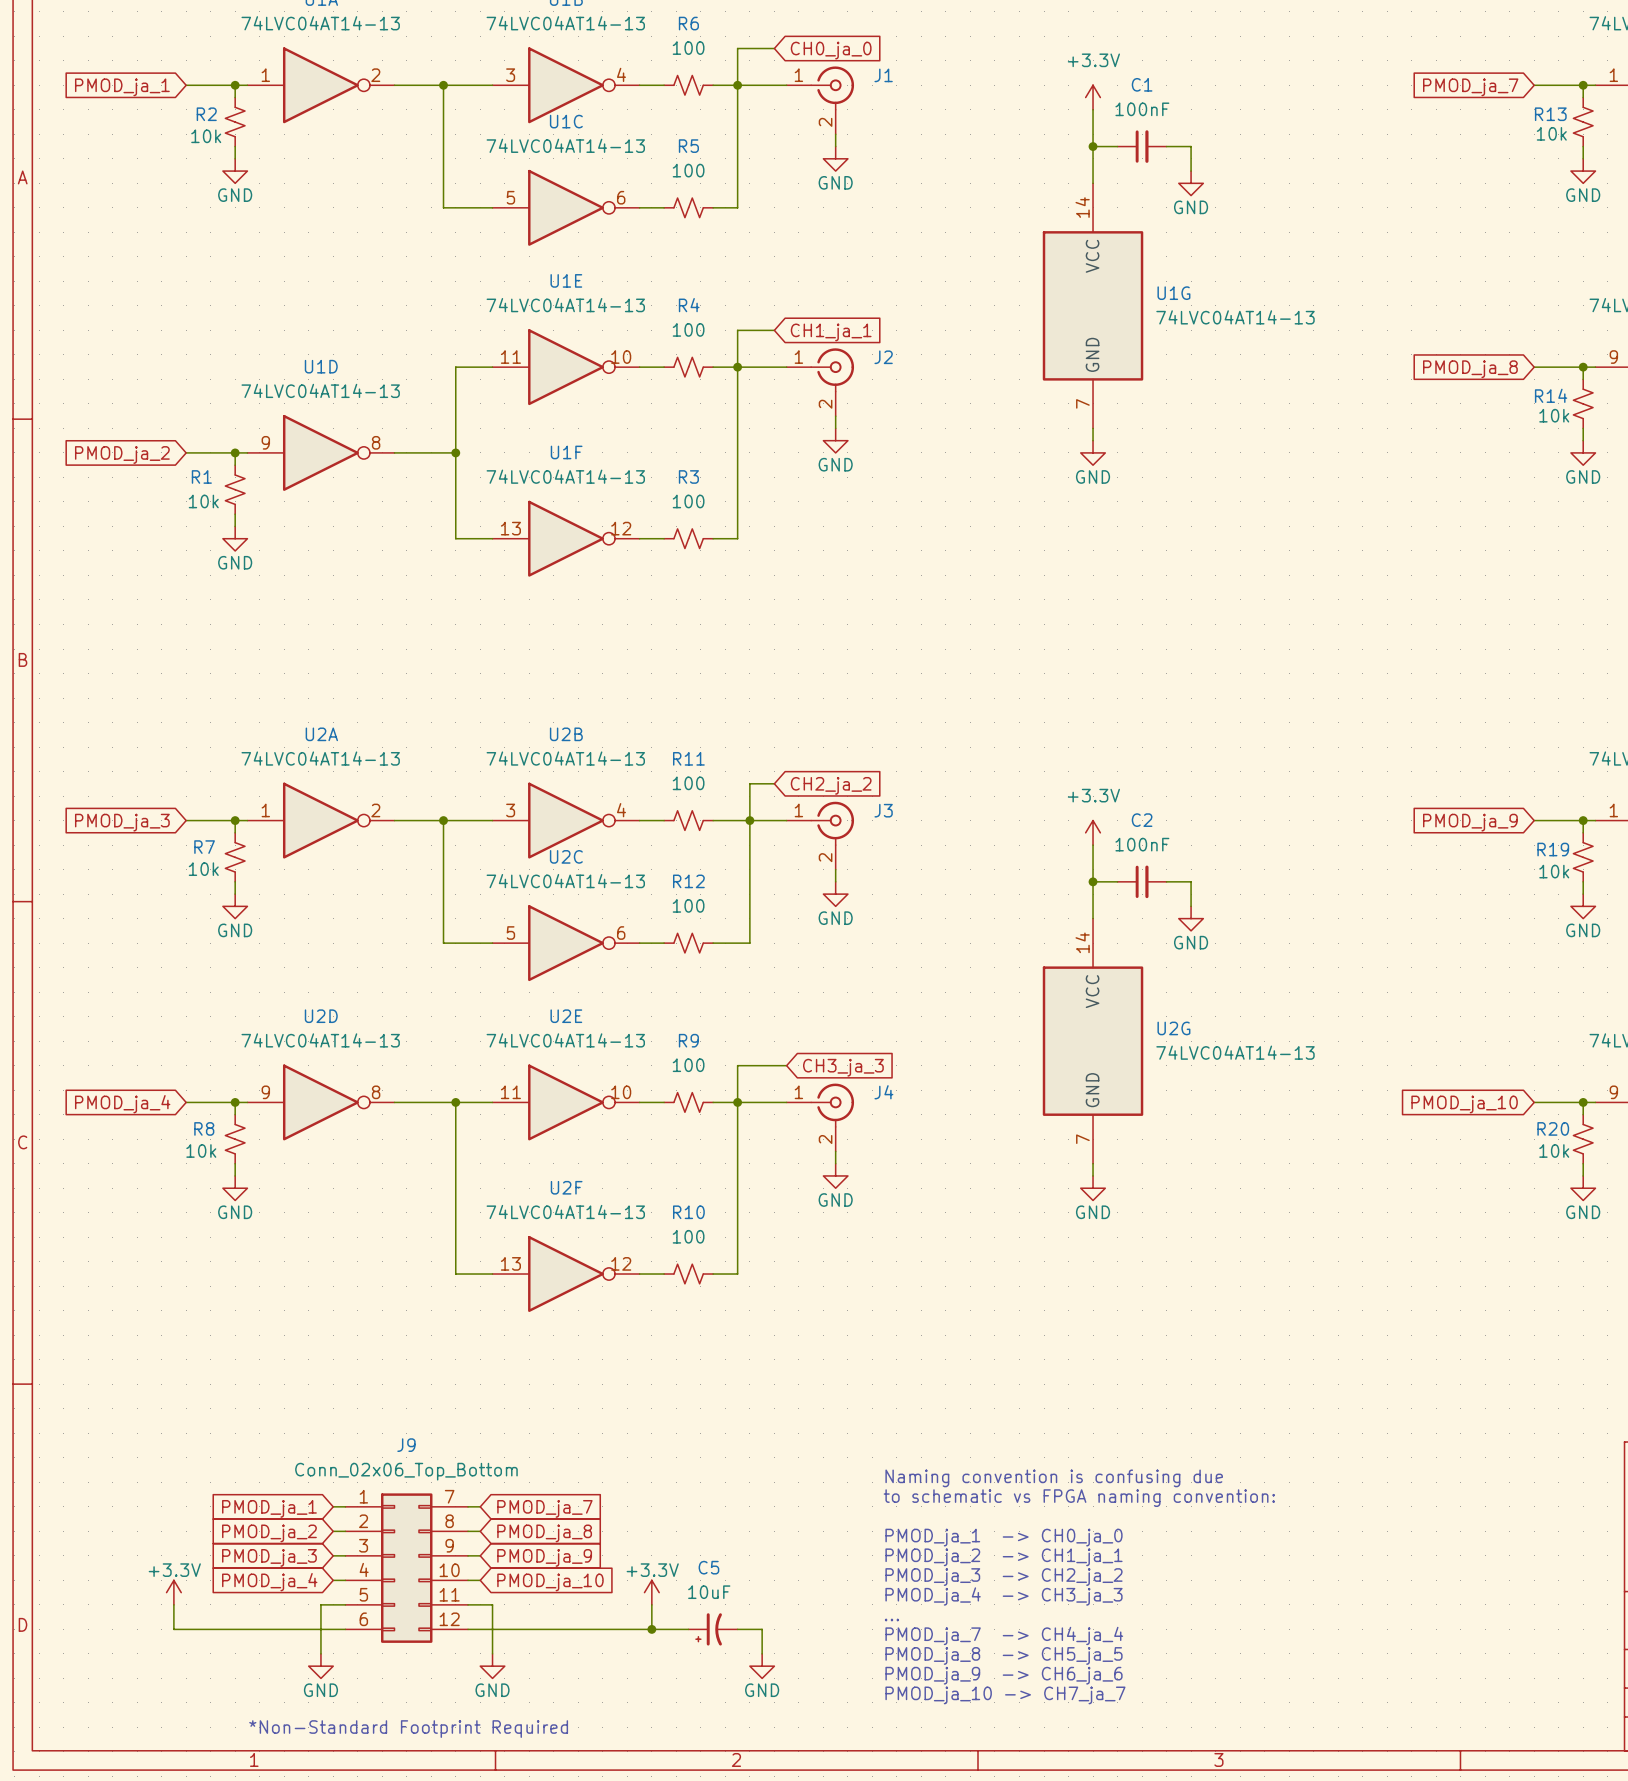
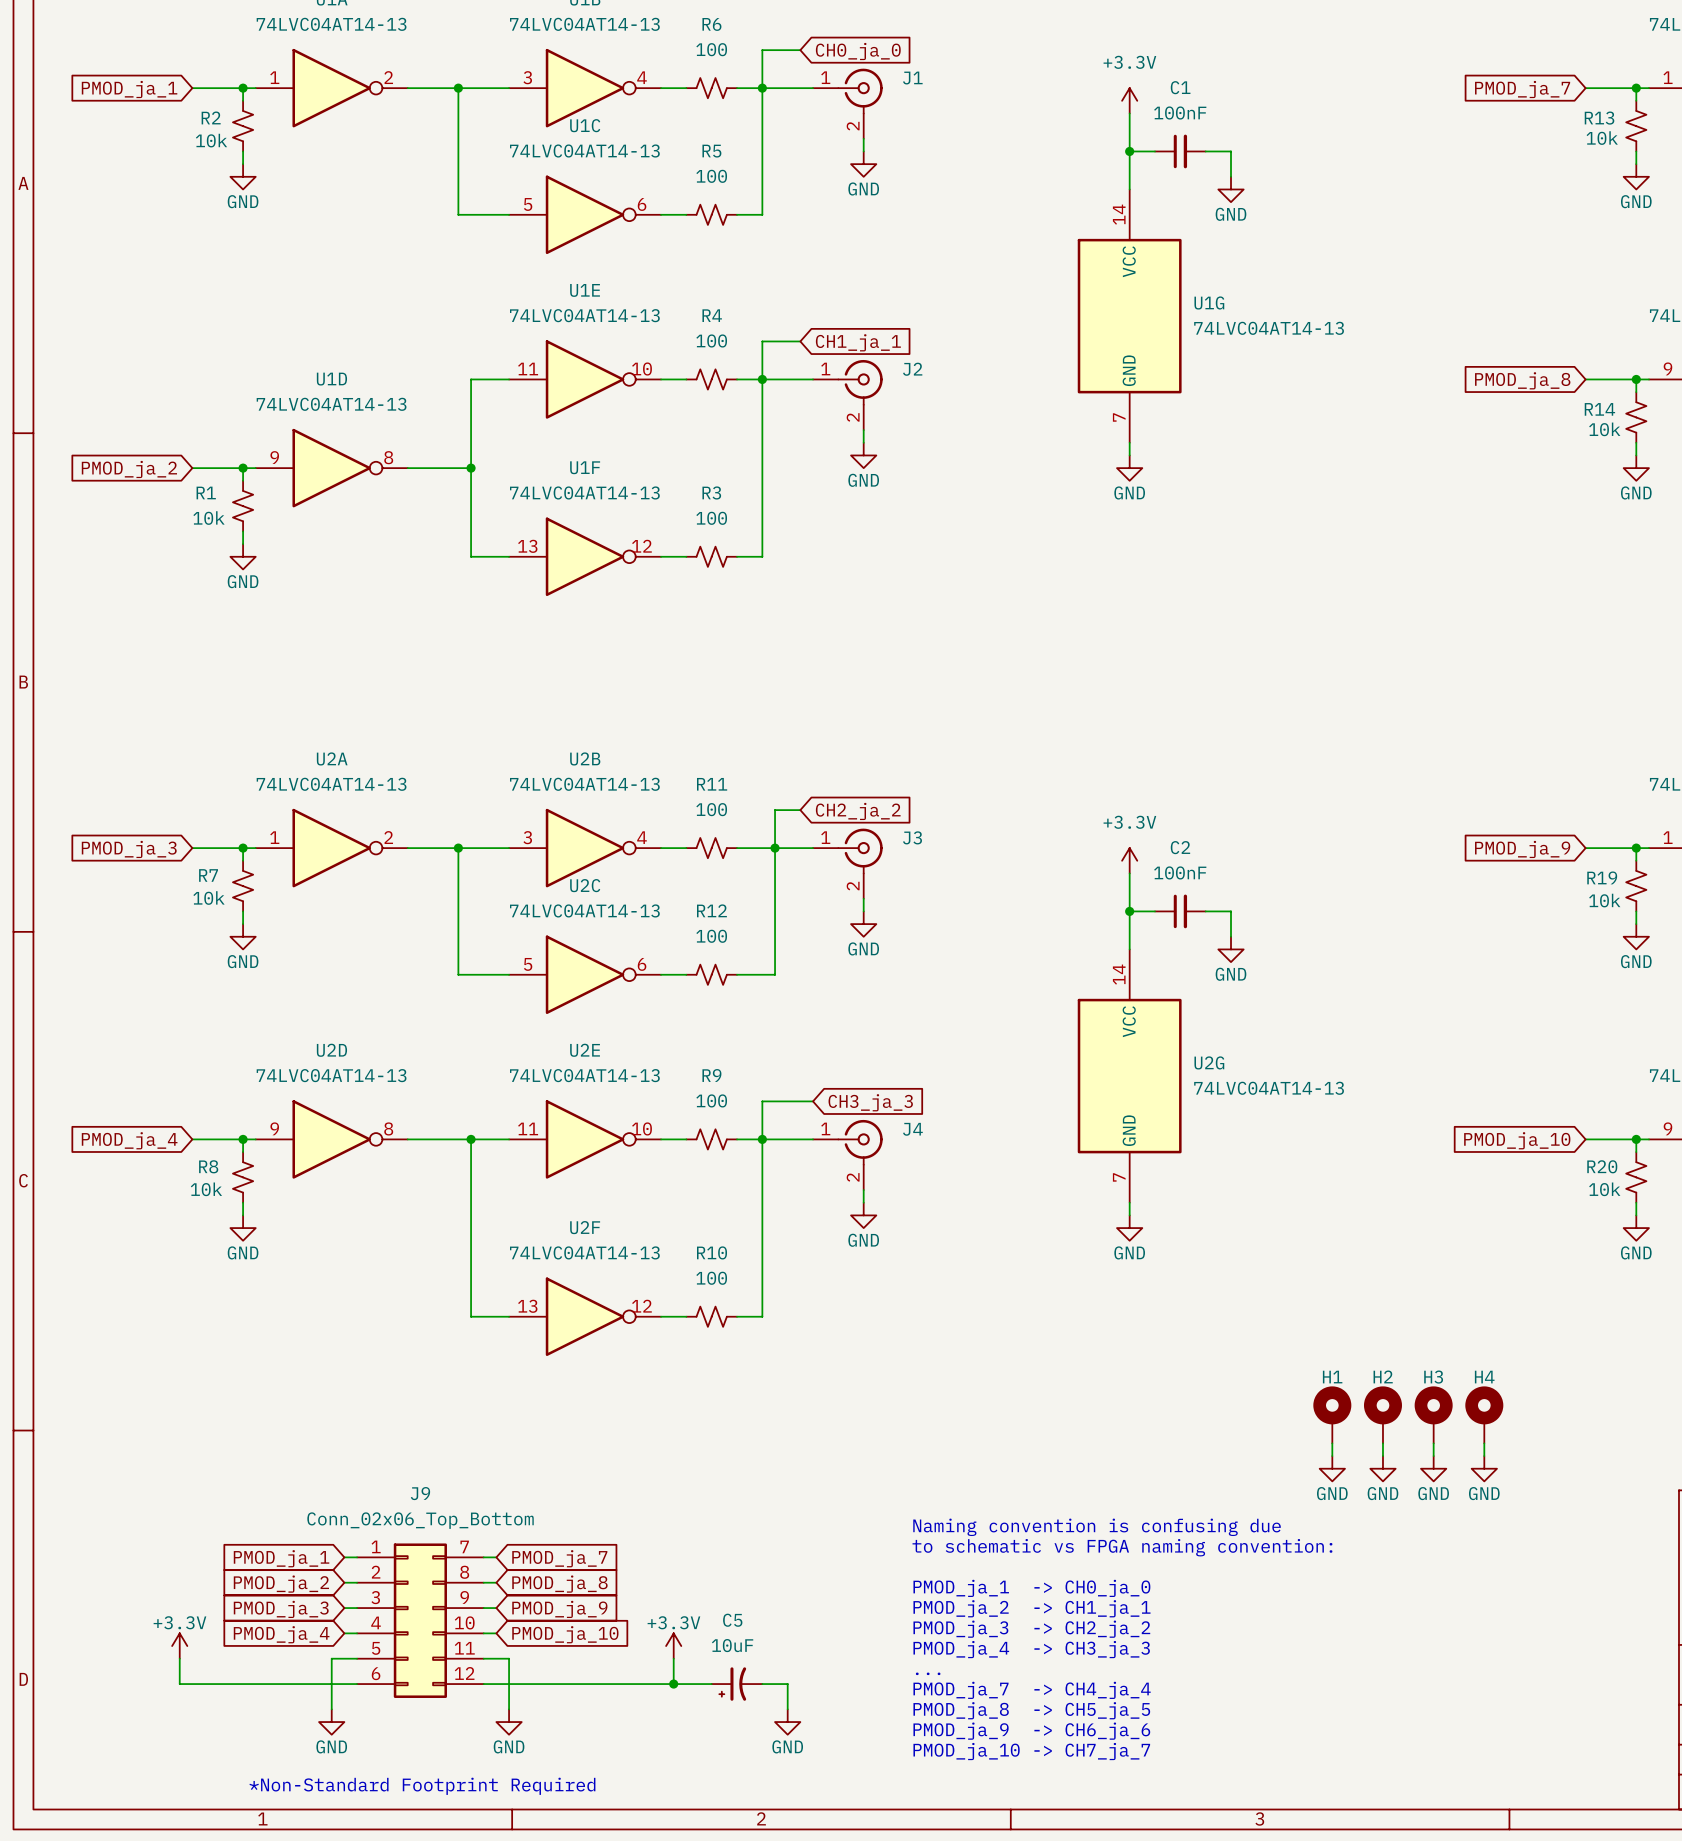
H1: none -> (1332, 1414)
H2: none -> (1382, 1414)
H3: none -> (1433, 1414)
H4: none -> (1484, 1414)
wire: none -> (1332, 1443) (1332, 1456)
wire: none -> (1382, 1443) (1382, 1456)
wire: none -> (1433, 1443) (1433, 1456)
wire: none -> (1484, 1443) (1484, 1456)
power symbol: none -> GND (1332, 1468)
power symbol: none -> GND (1382, 1468)
power symbol: none -> GND (1433, 1468)
power symbol: none -> GND (1484, 1468)

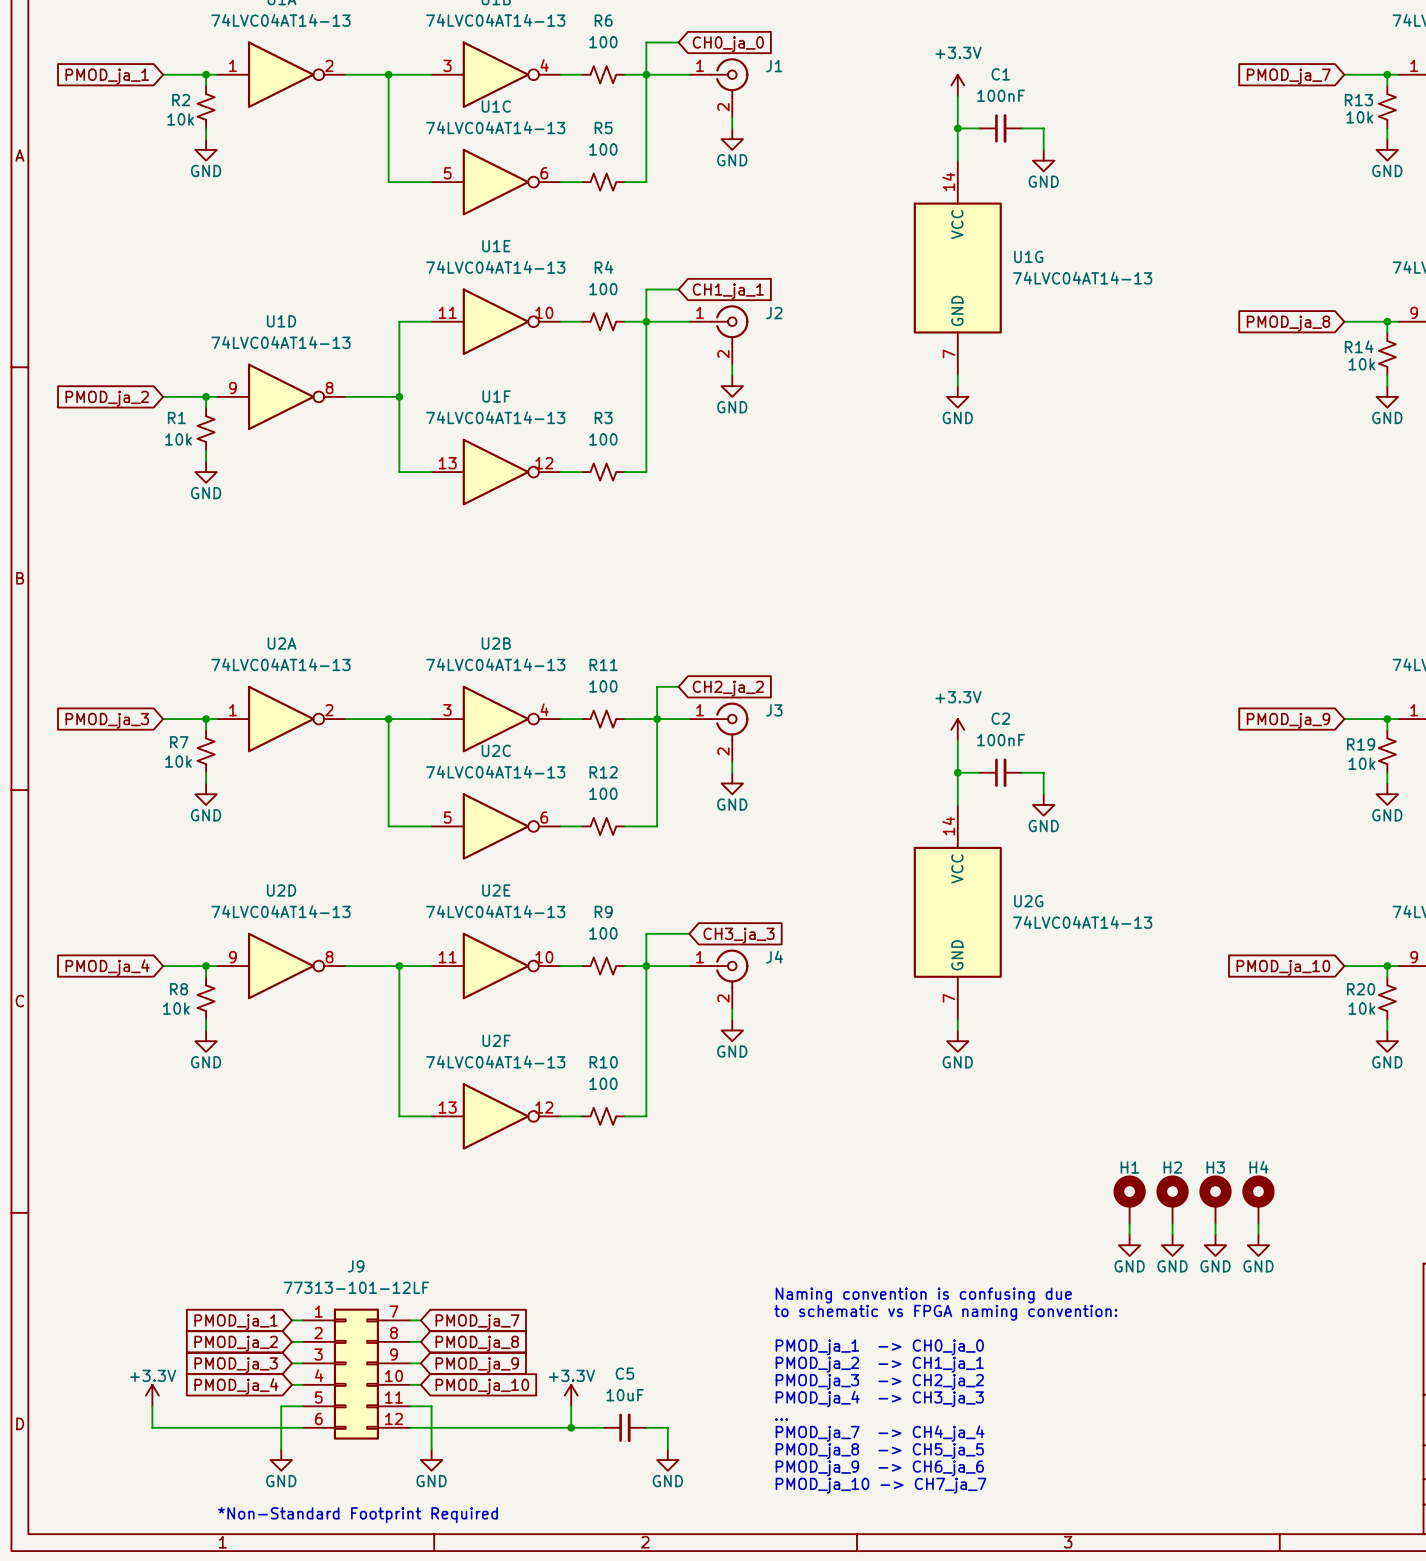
J9 value: Conn_02x06_Top_Bottom (420, 1520) -> 77313-101-12LF (356, 1287)
C5 symbol: [711, 1667, 763, 1701] -> [603, 1413, 647, 1443]

